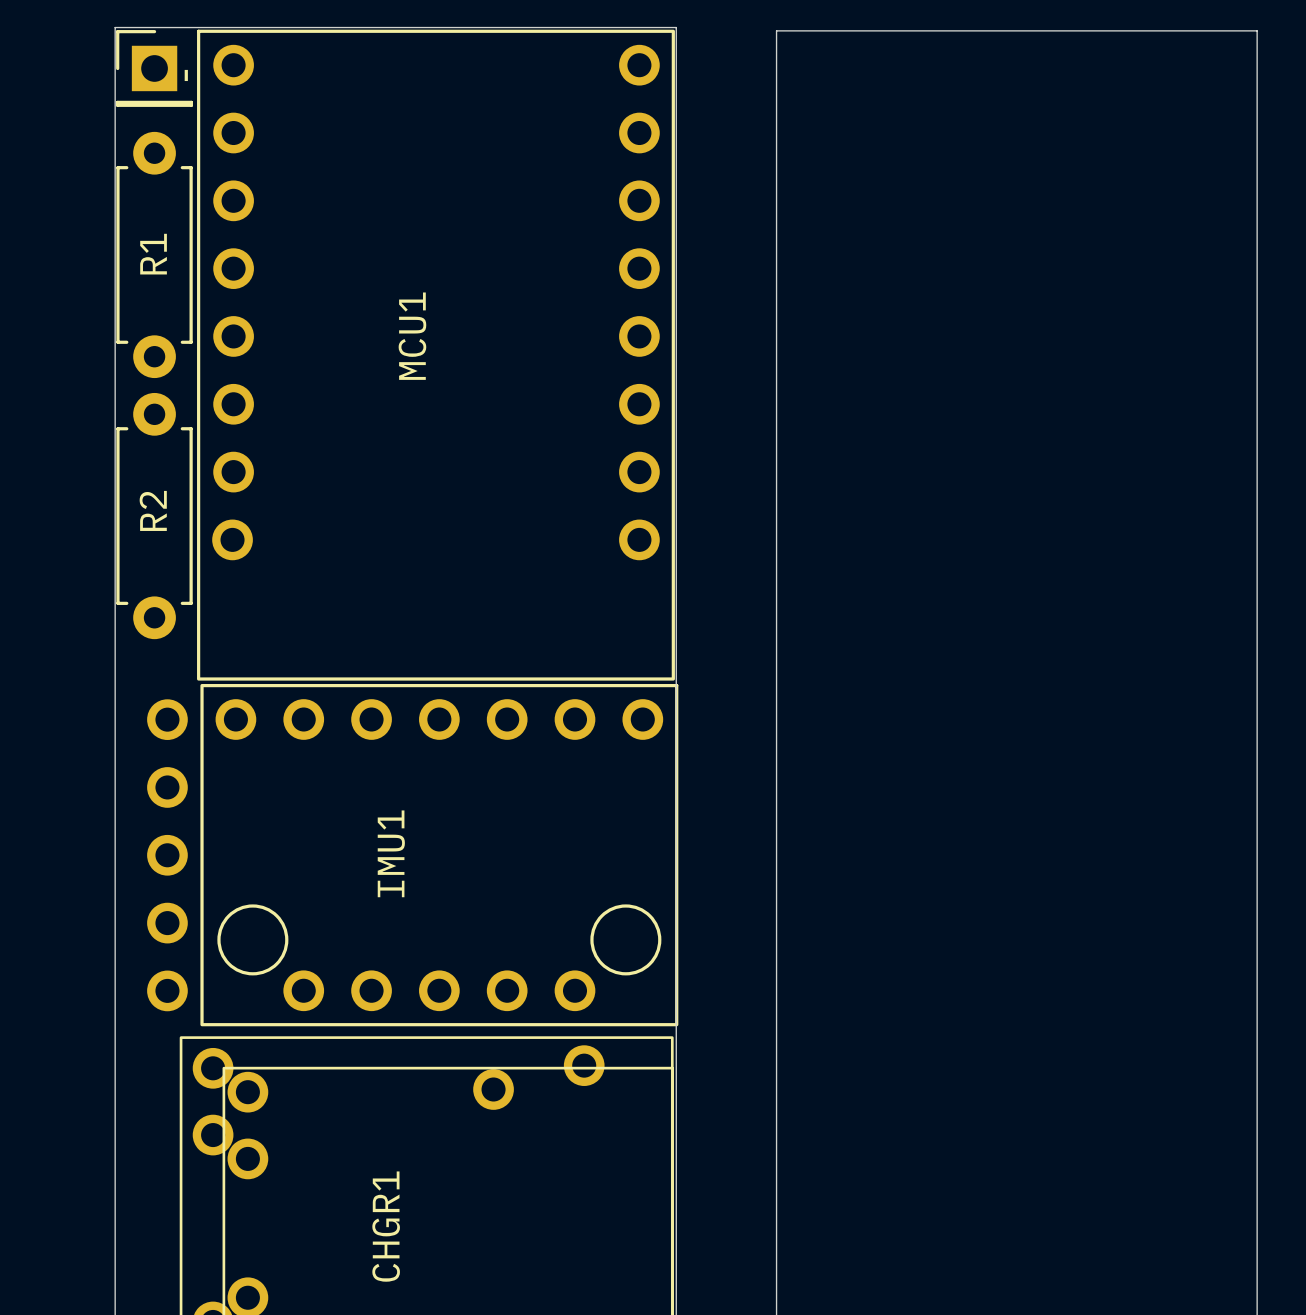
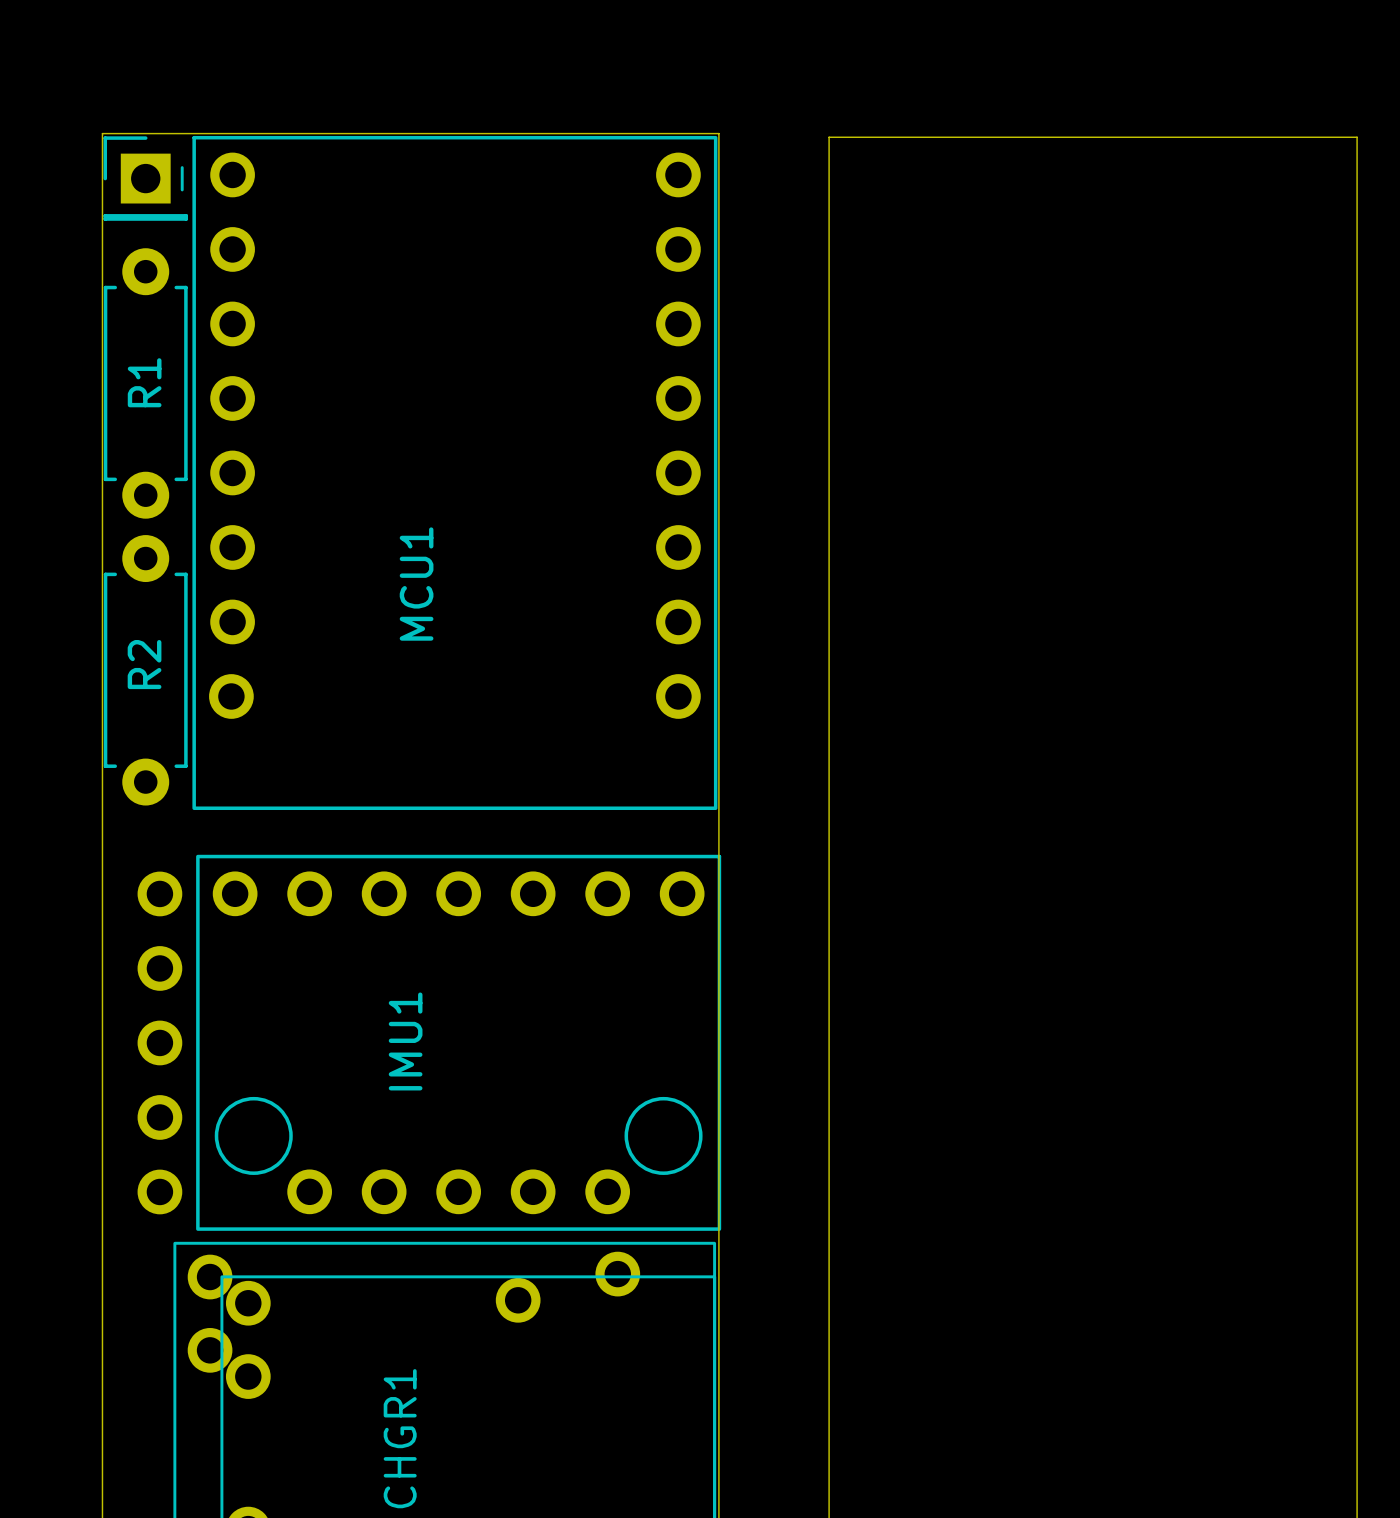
MCU1 footprint: [197, 29, 675, 681] -> [192, 135, 718, 811]
MCU1 name position: MCU1 (412, 336) -> MCU1 (416, 584)

